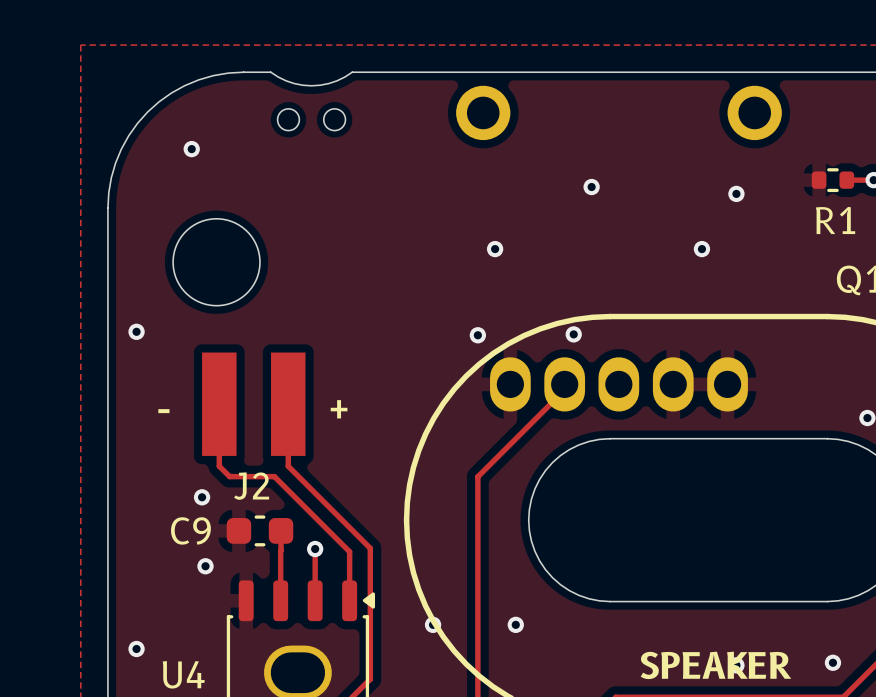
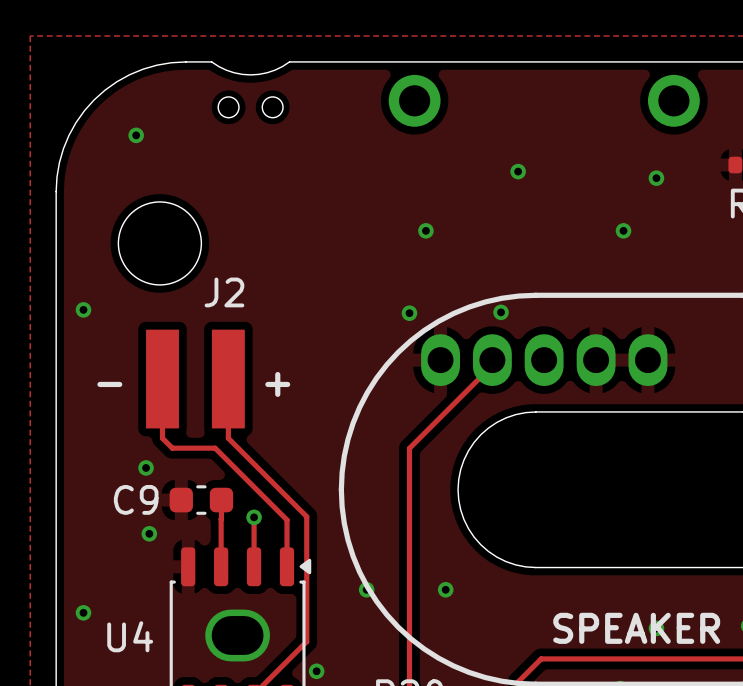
J2 name position: J2 (251, 486) -> J2 (224, 292)

